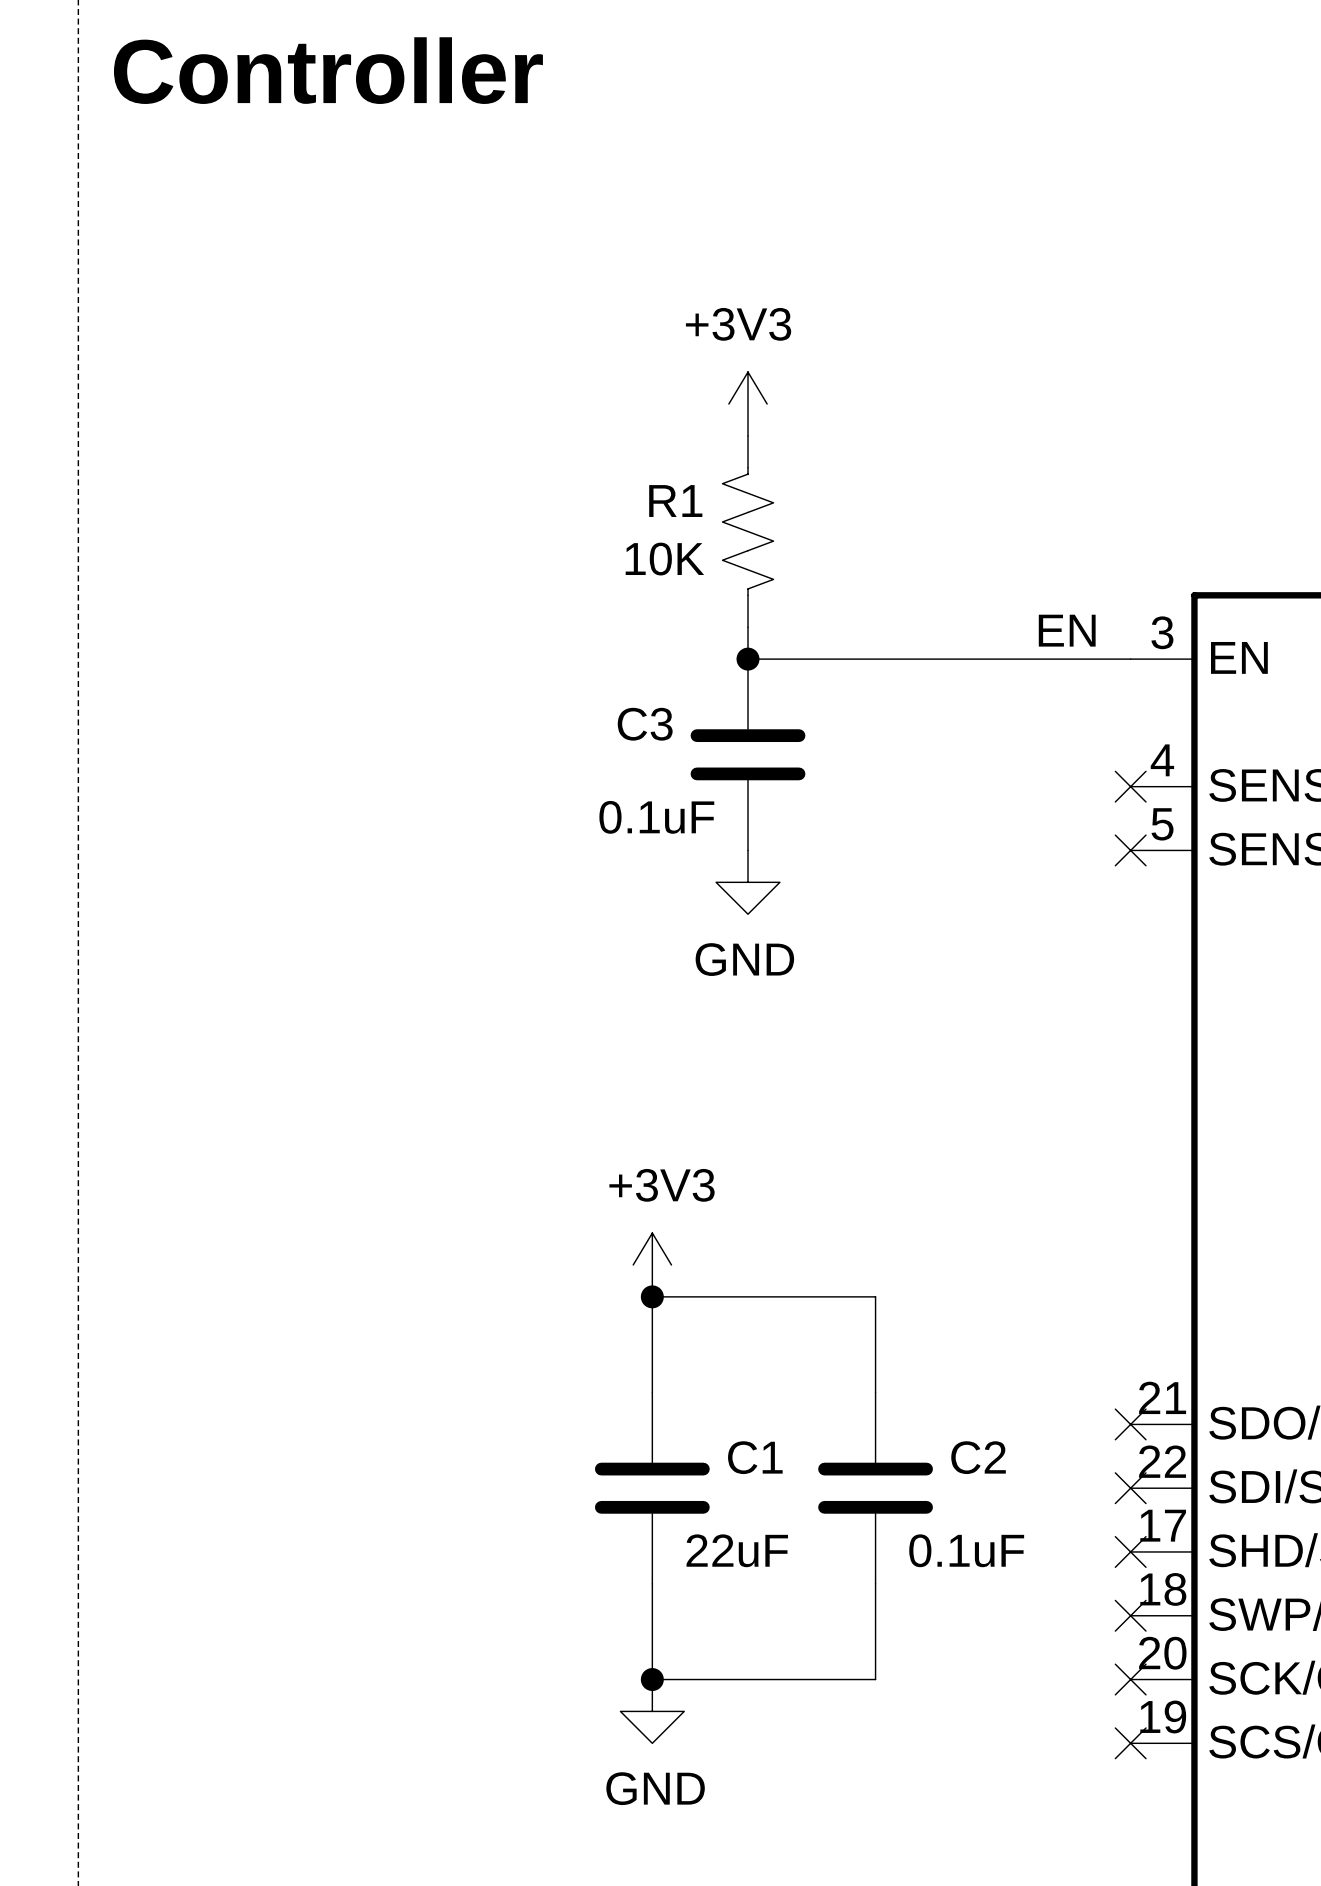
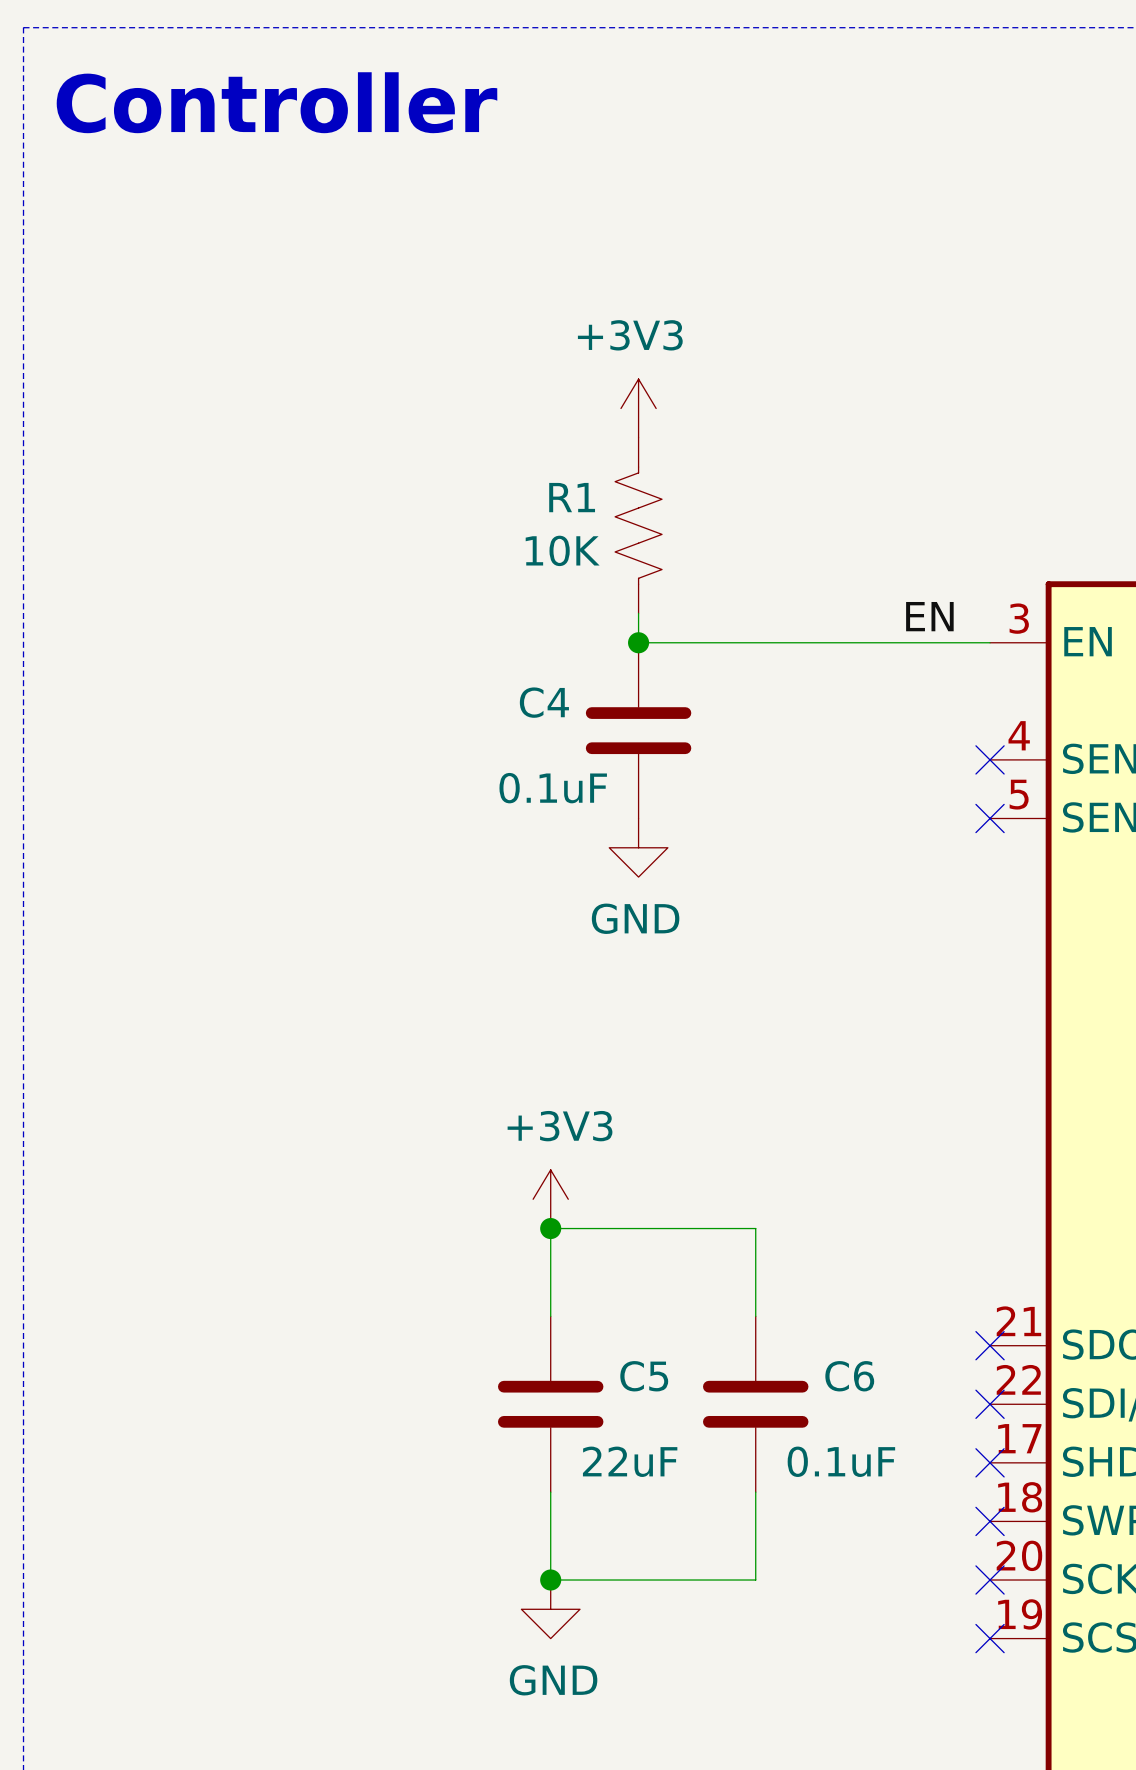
C3 name: C3 (645, 724) -> C4 (544, 702)
C1 name: C1 (755, 1457) -> C5 (644, 1376)
C2 name: C2 (978, 1457) -> C6 (849, 1376)

